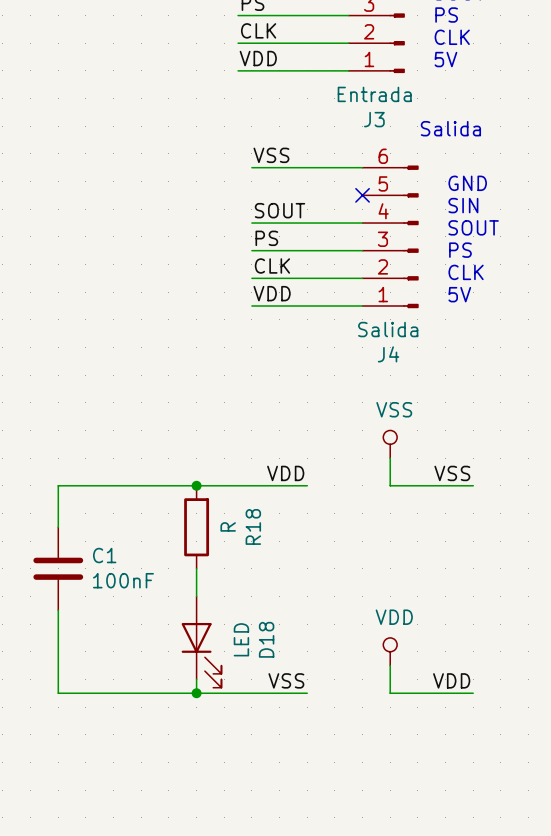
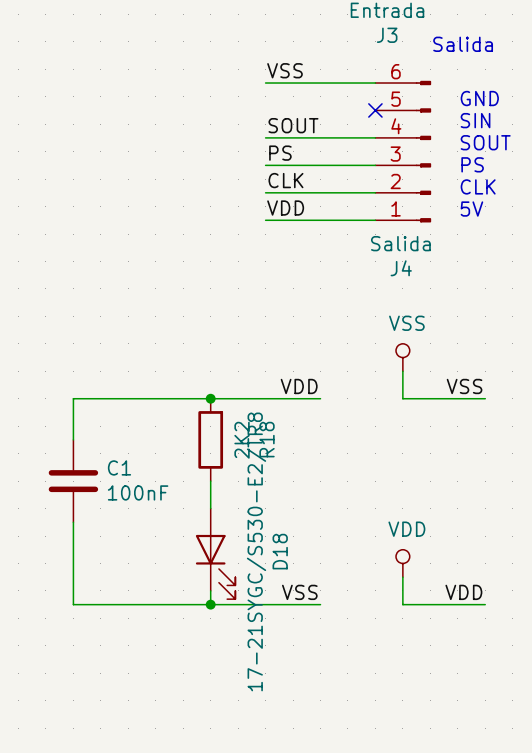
R18 value: R (228, 526) -> 2K2 (242, 440)
D18 value: LED (241, 639) -> 17-21SYGC/S530-E2/TR8 (256, 551)

